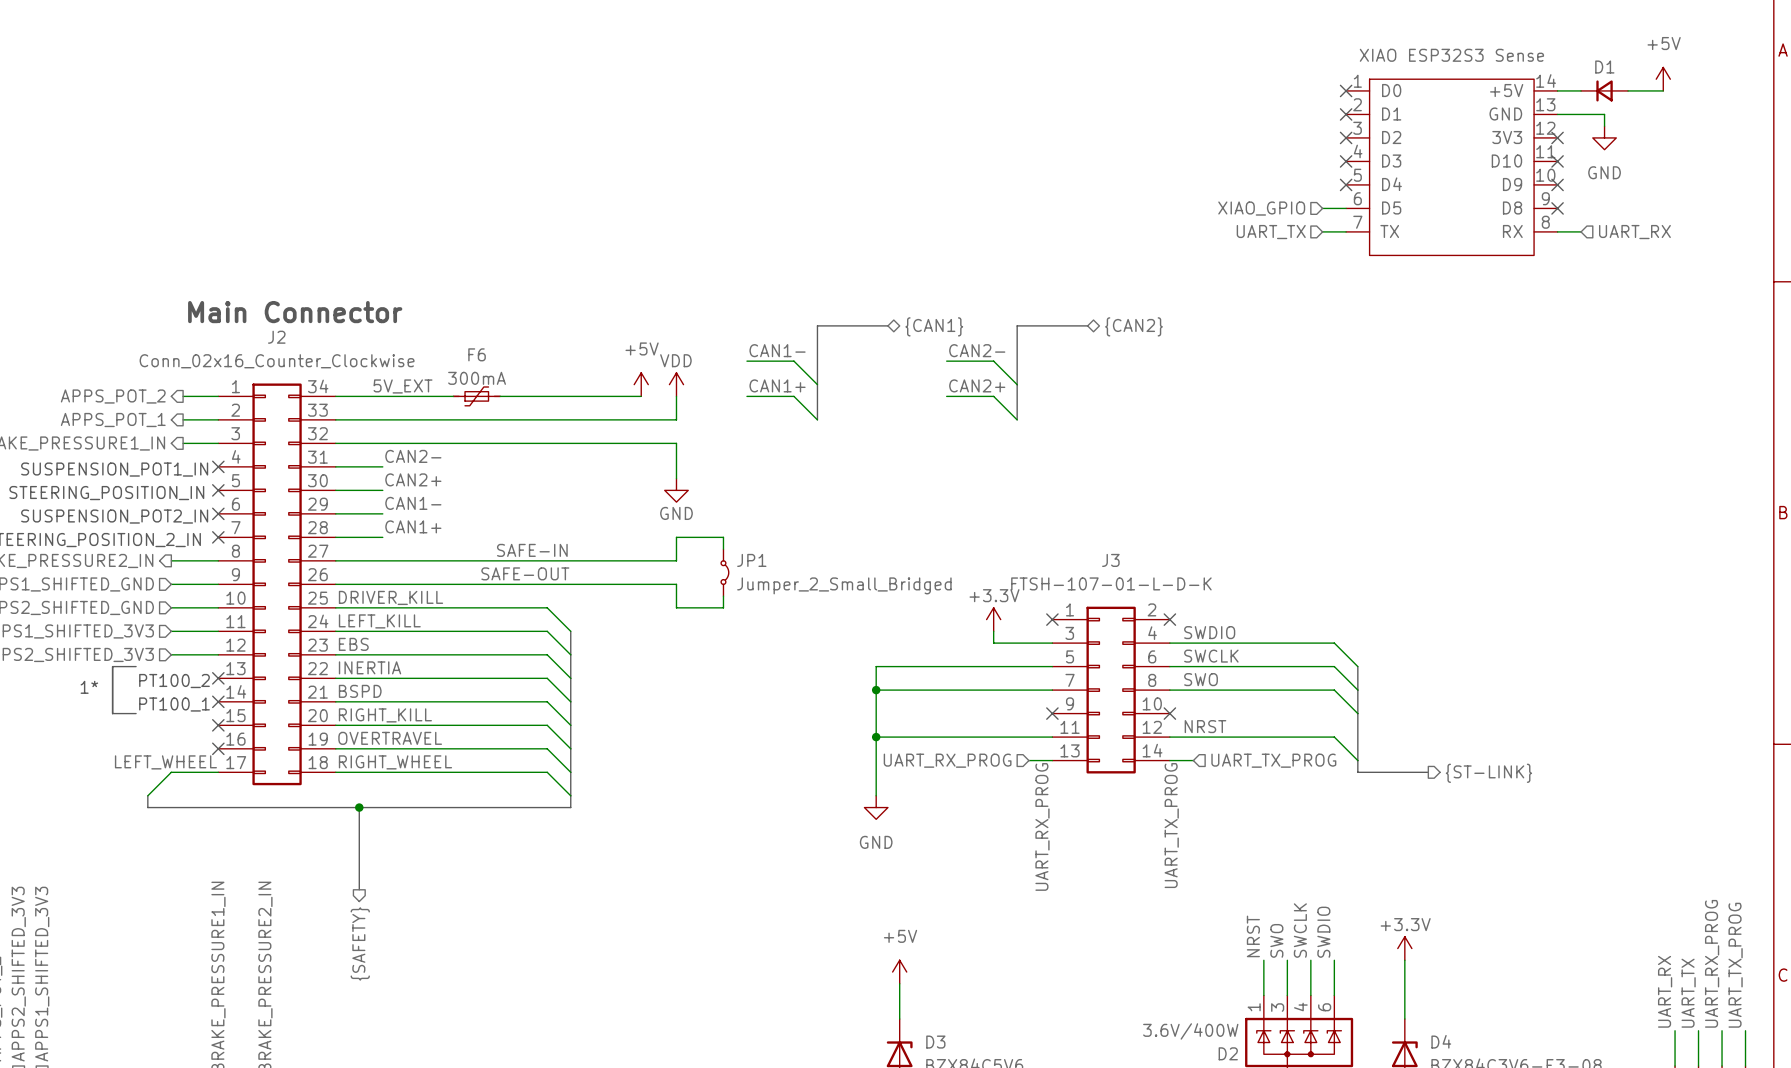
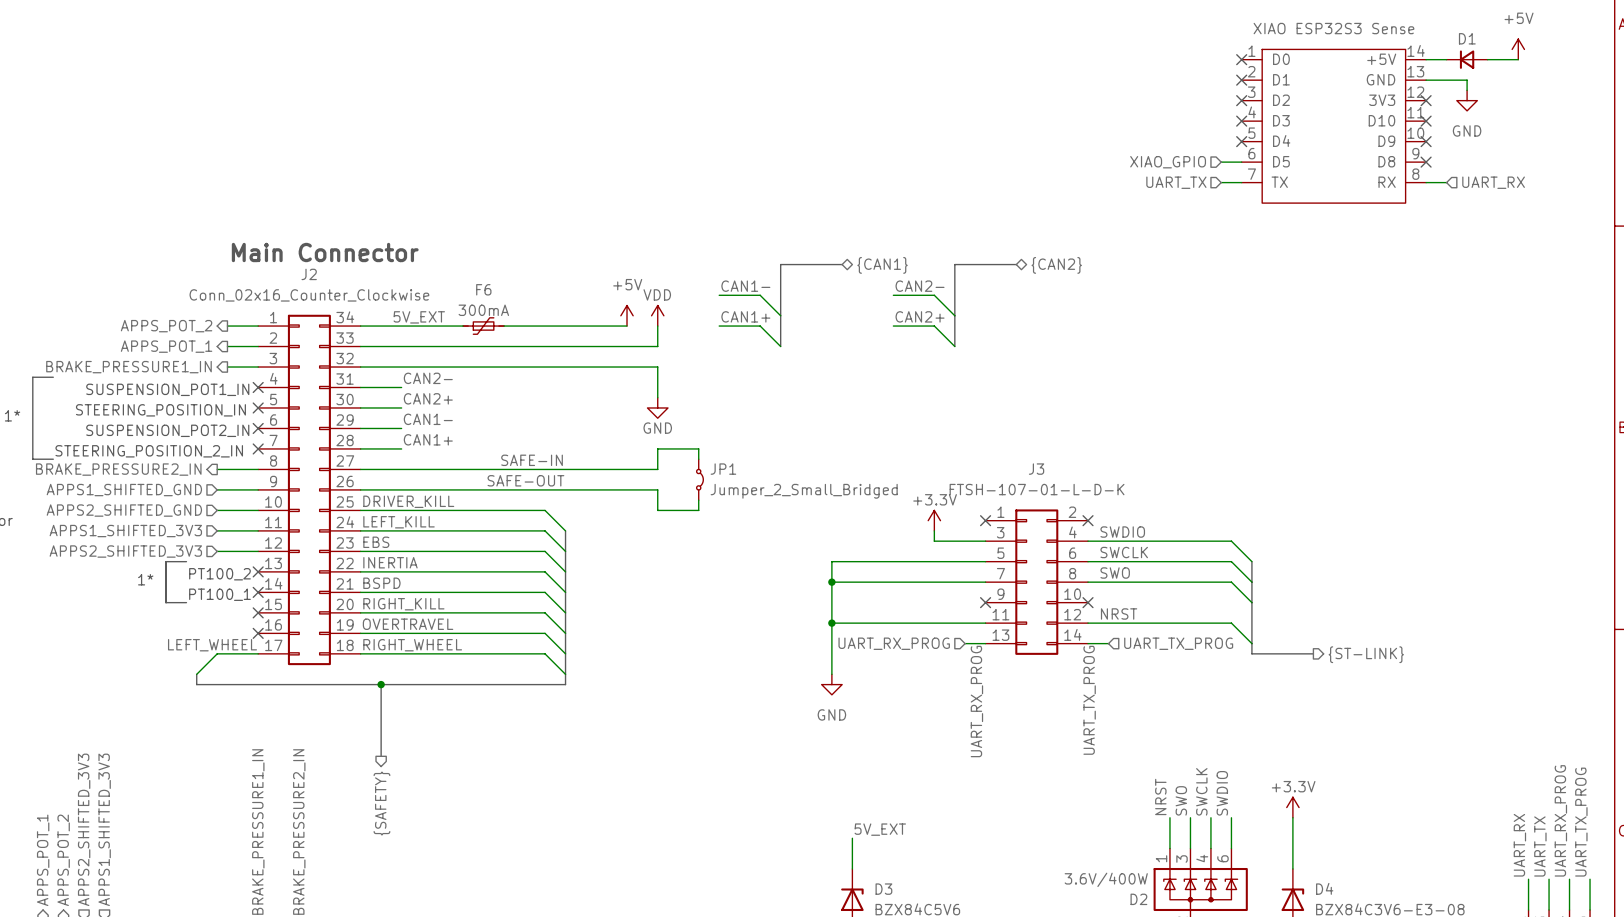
power symbol: +5V (899, 972) -> none
label: none -> 5V_EXT (880, 829)

